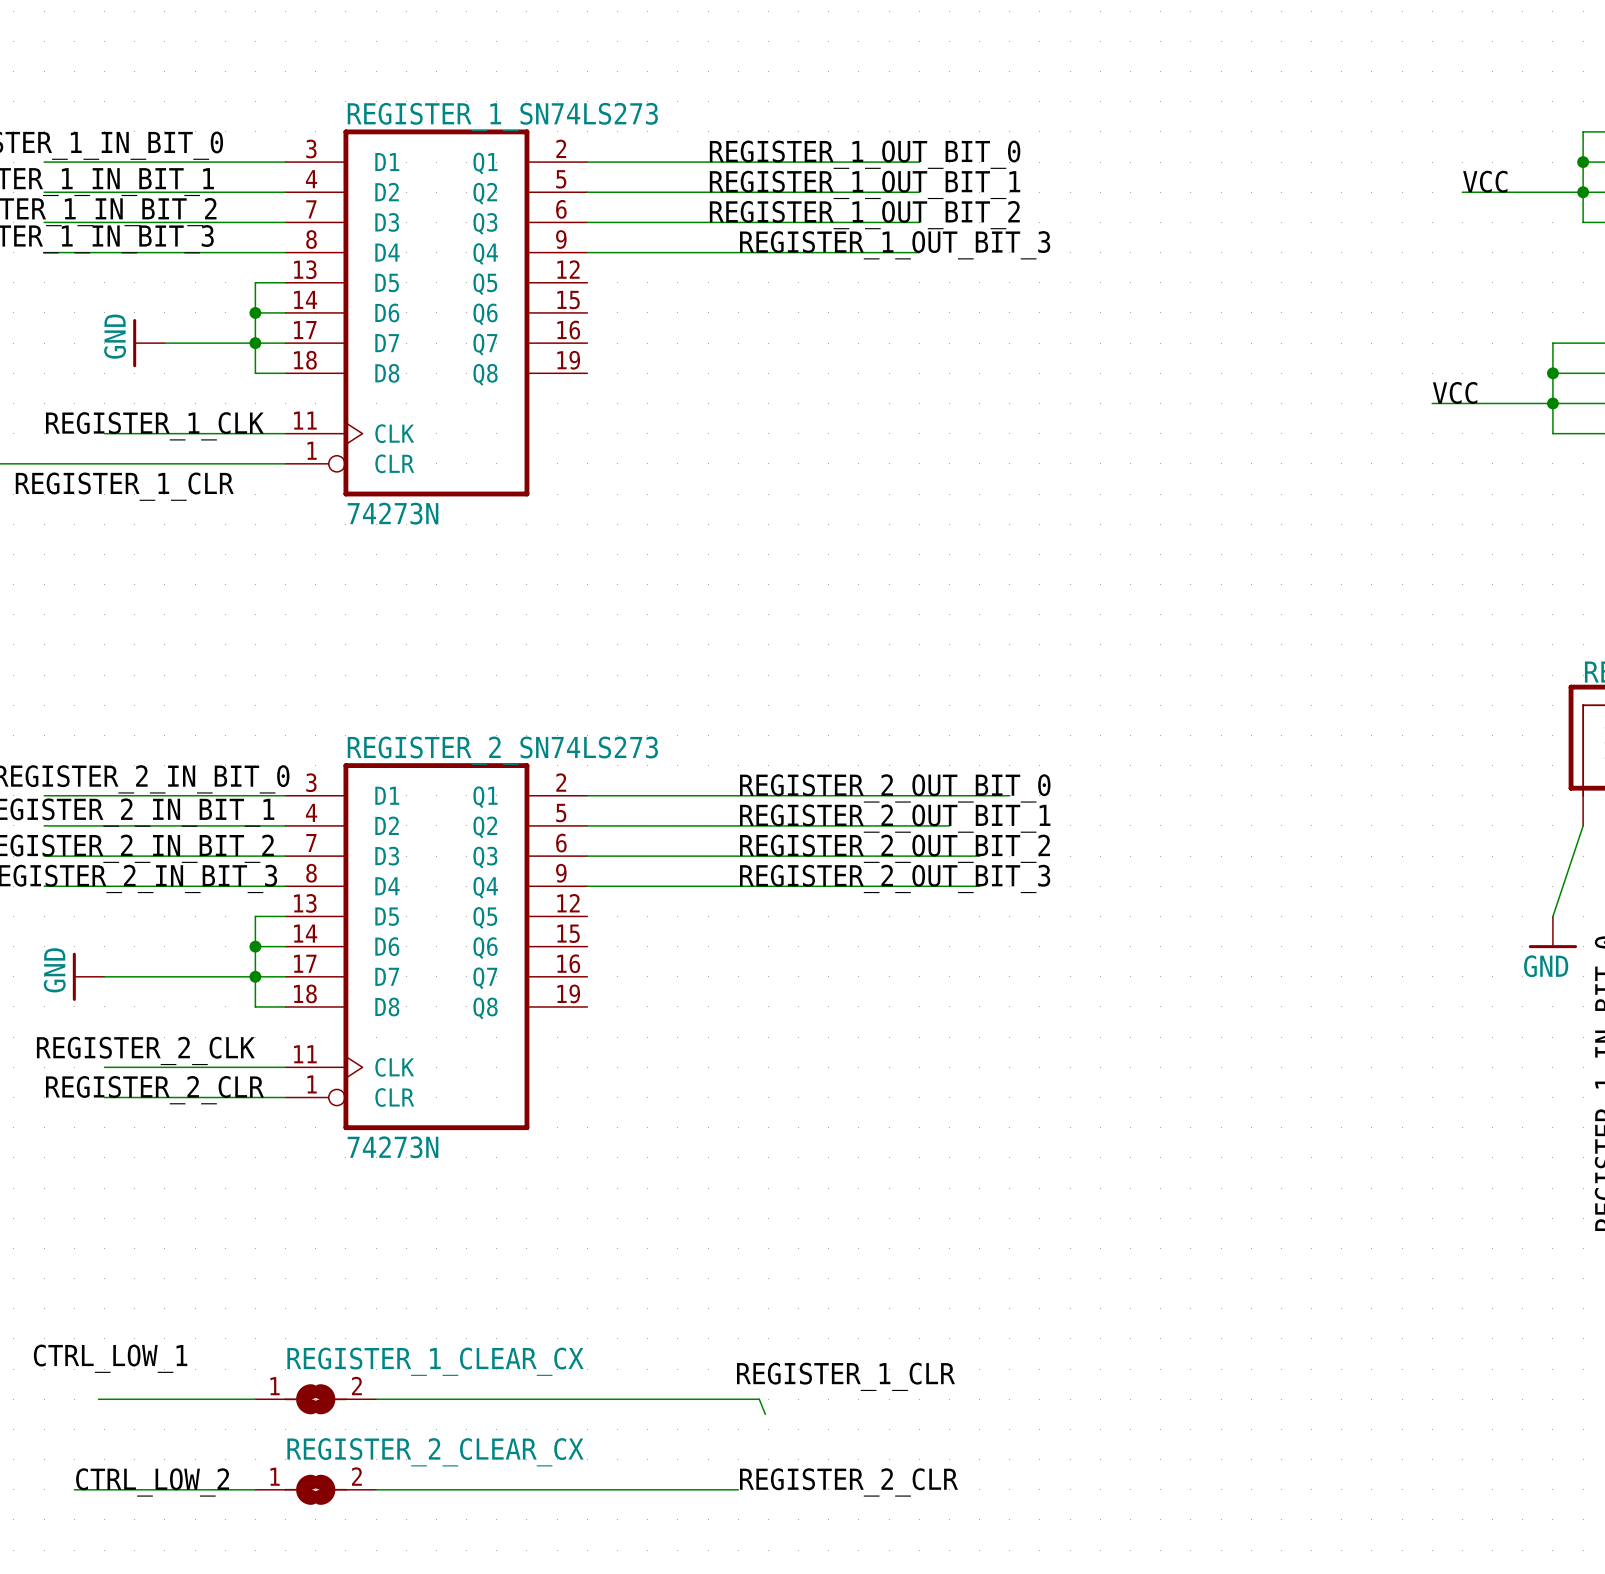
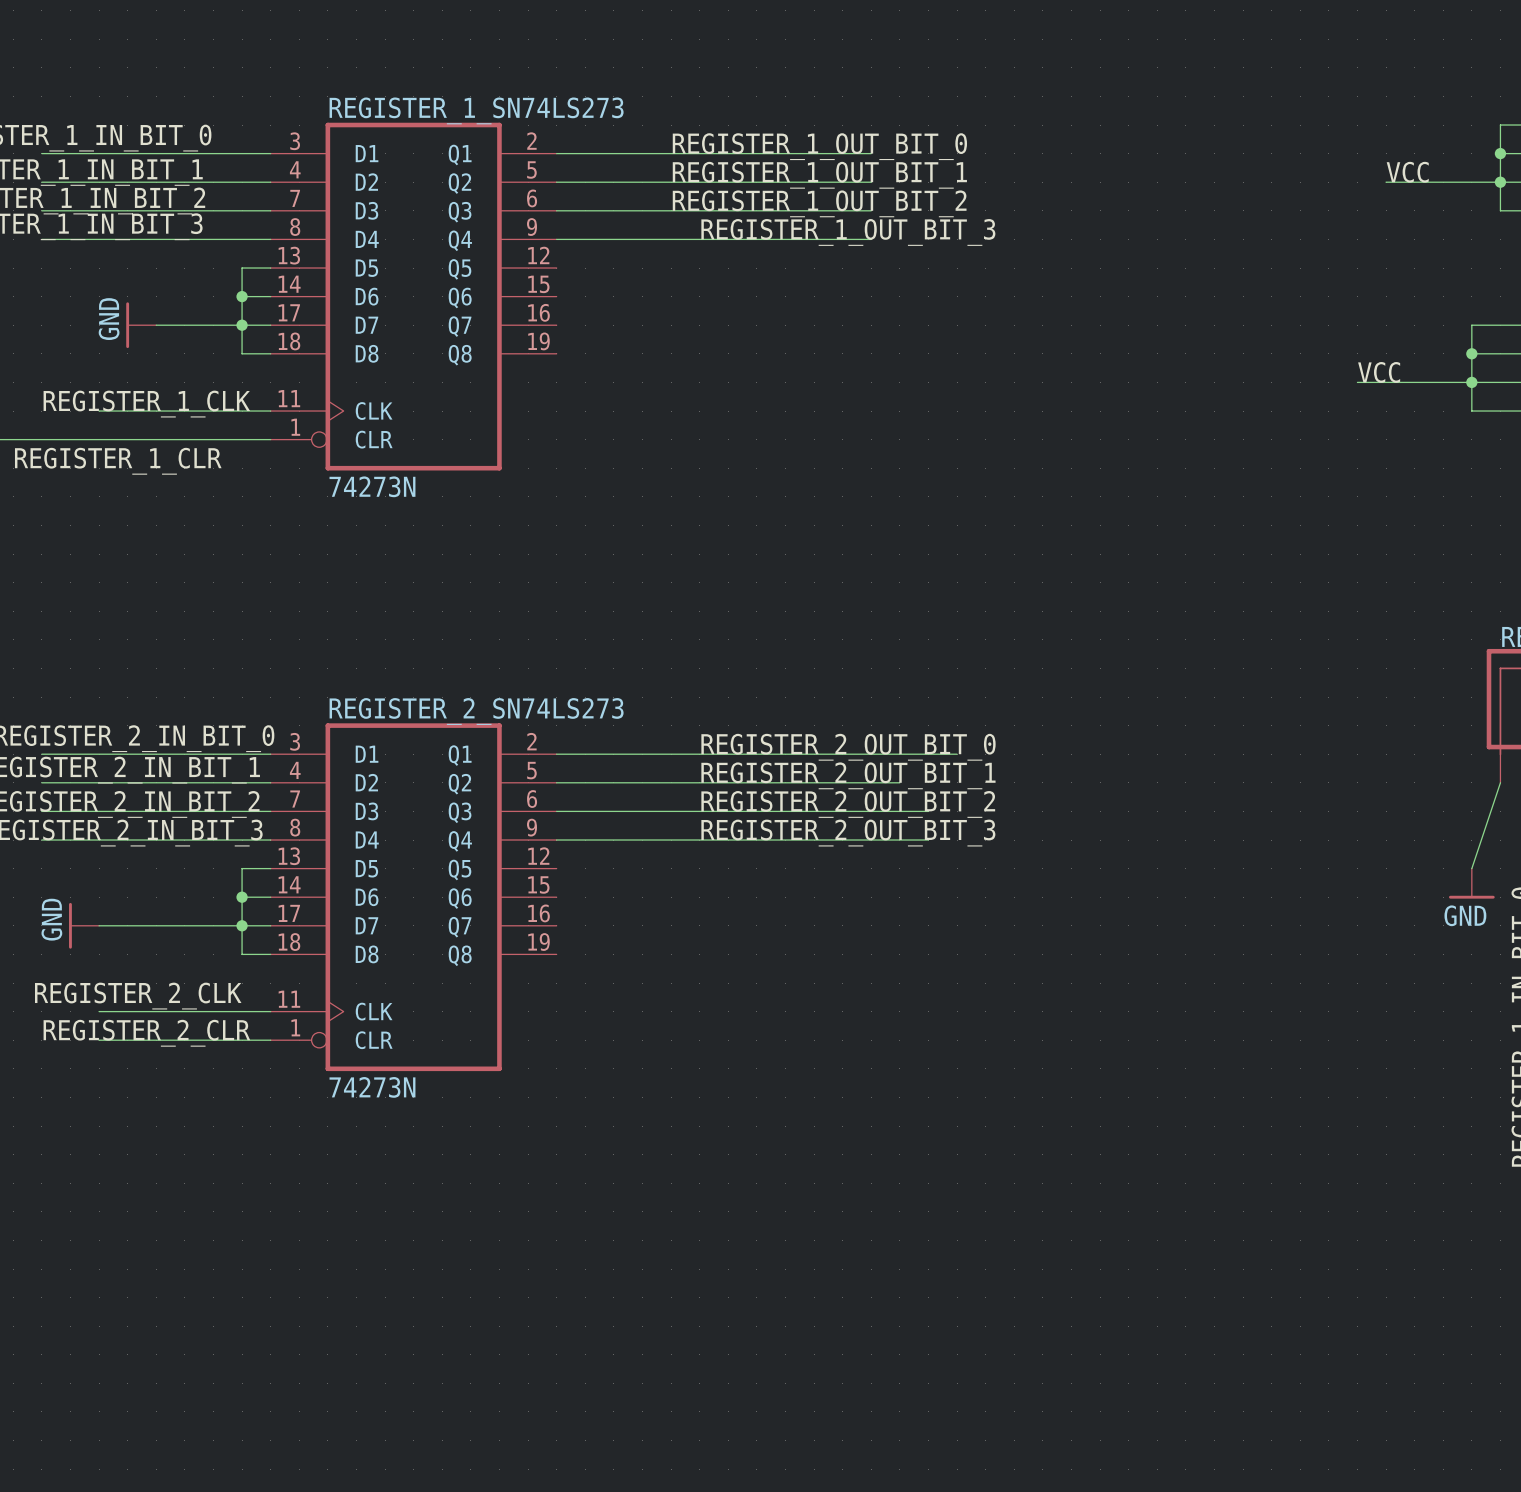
label: CTRL_LOW_1 (110, 1358) -> none
label: REGISTER_1_CLR (845, 1376) -> none
wire: (98, 1399) (255, 1399) -> none
REGISTER_1_CLEAR_CX: (315, 1399) -> none
wire: (376, 1399) (759, 1399) (765, 1414) -> none
label: CTRL_LOW_2 (152, 1482) -> none
label: REGISTER_2_CLR (849, 1482) -> none
wire: (74, 1489) (255, 1489) -> none
REGISTER_2_CLEAR_CX: (315, 1489) -> none
wire: (376, 1489) (738, 1489) -> none

